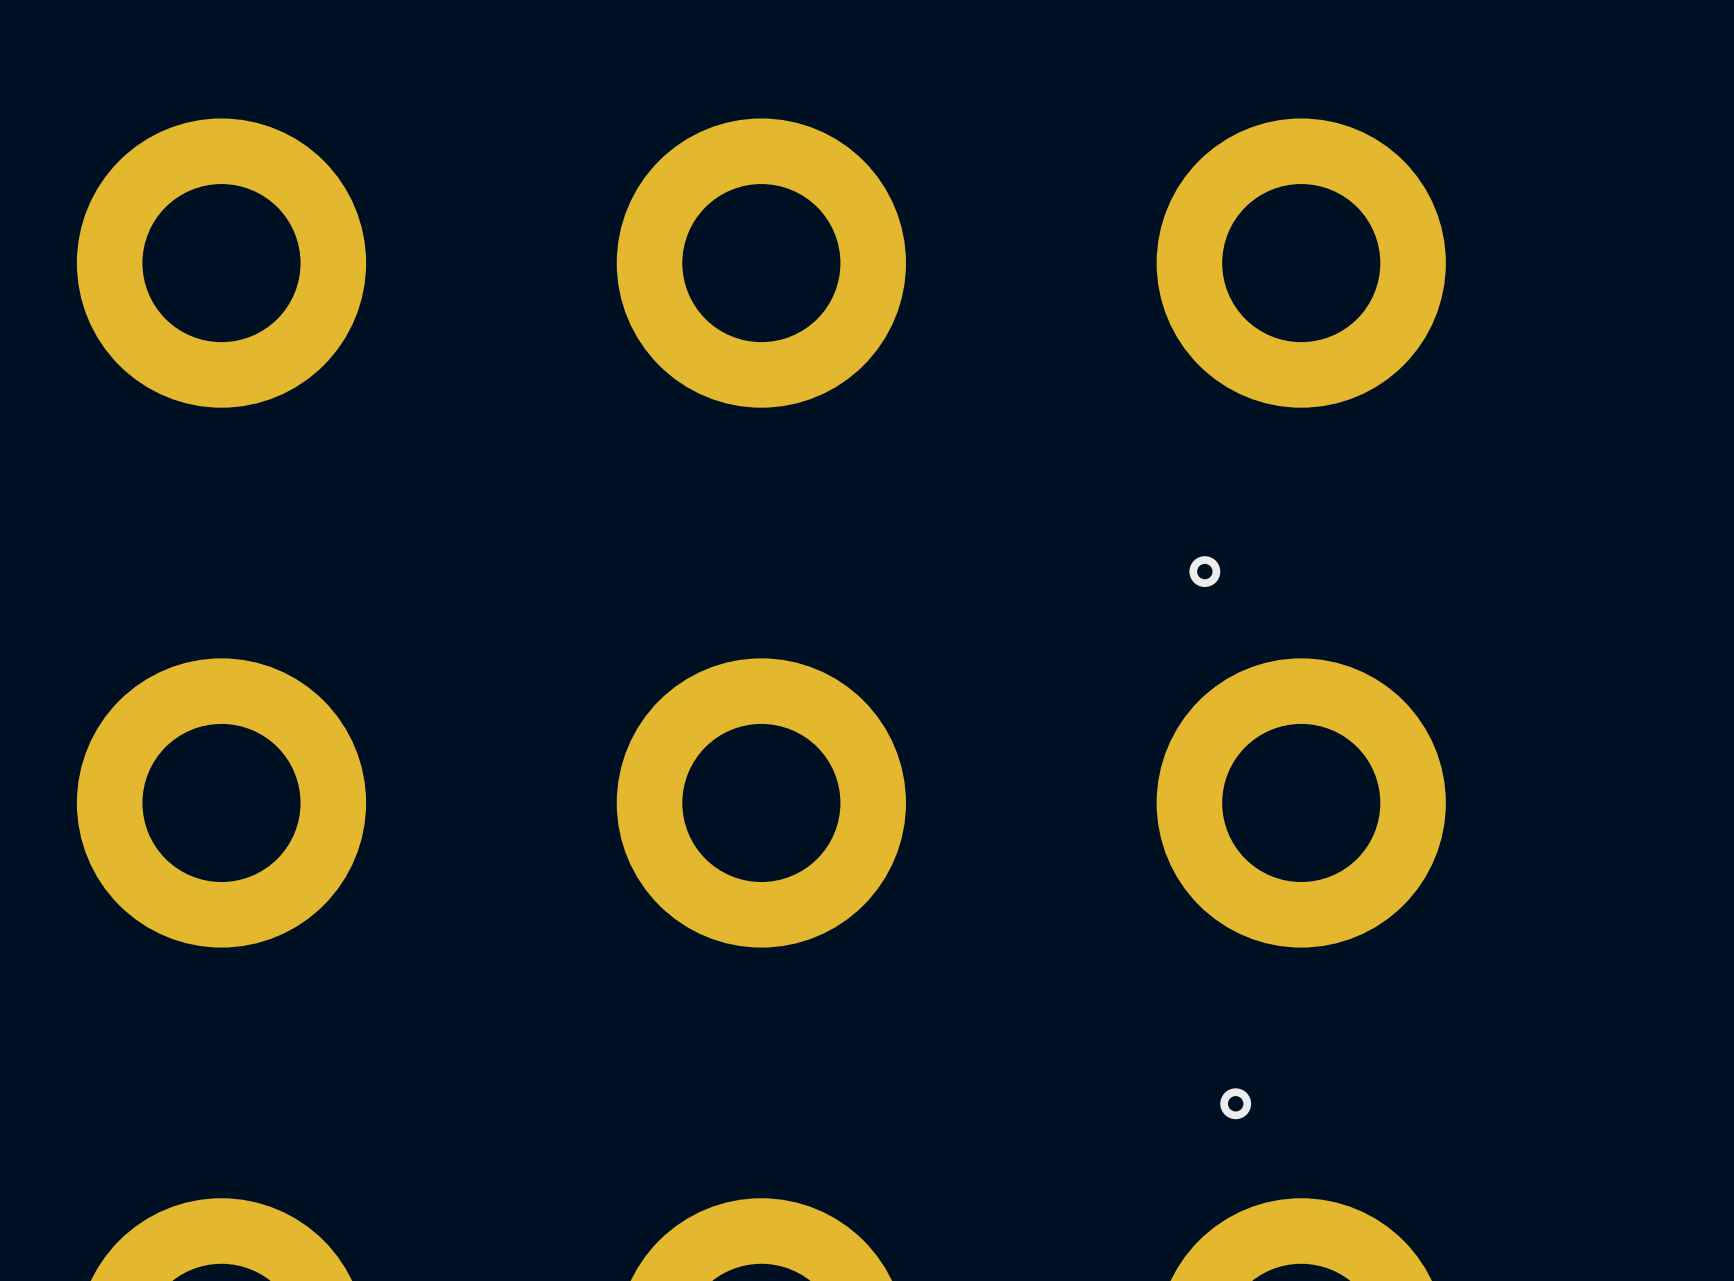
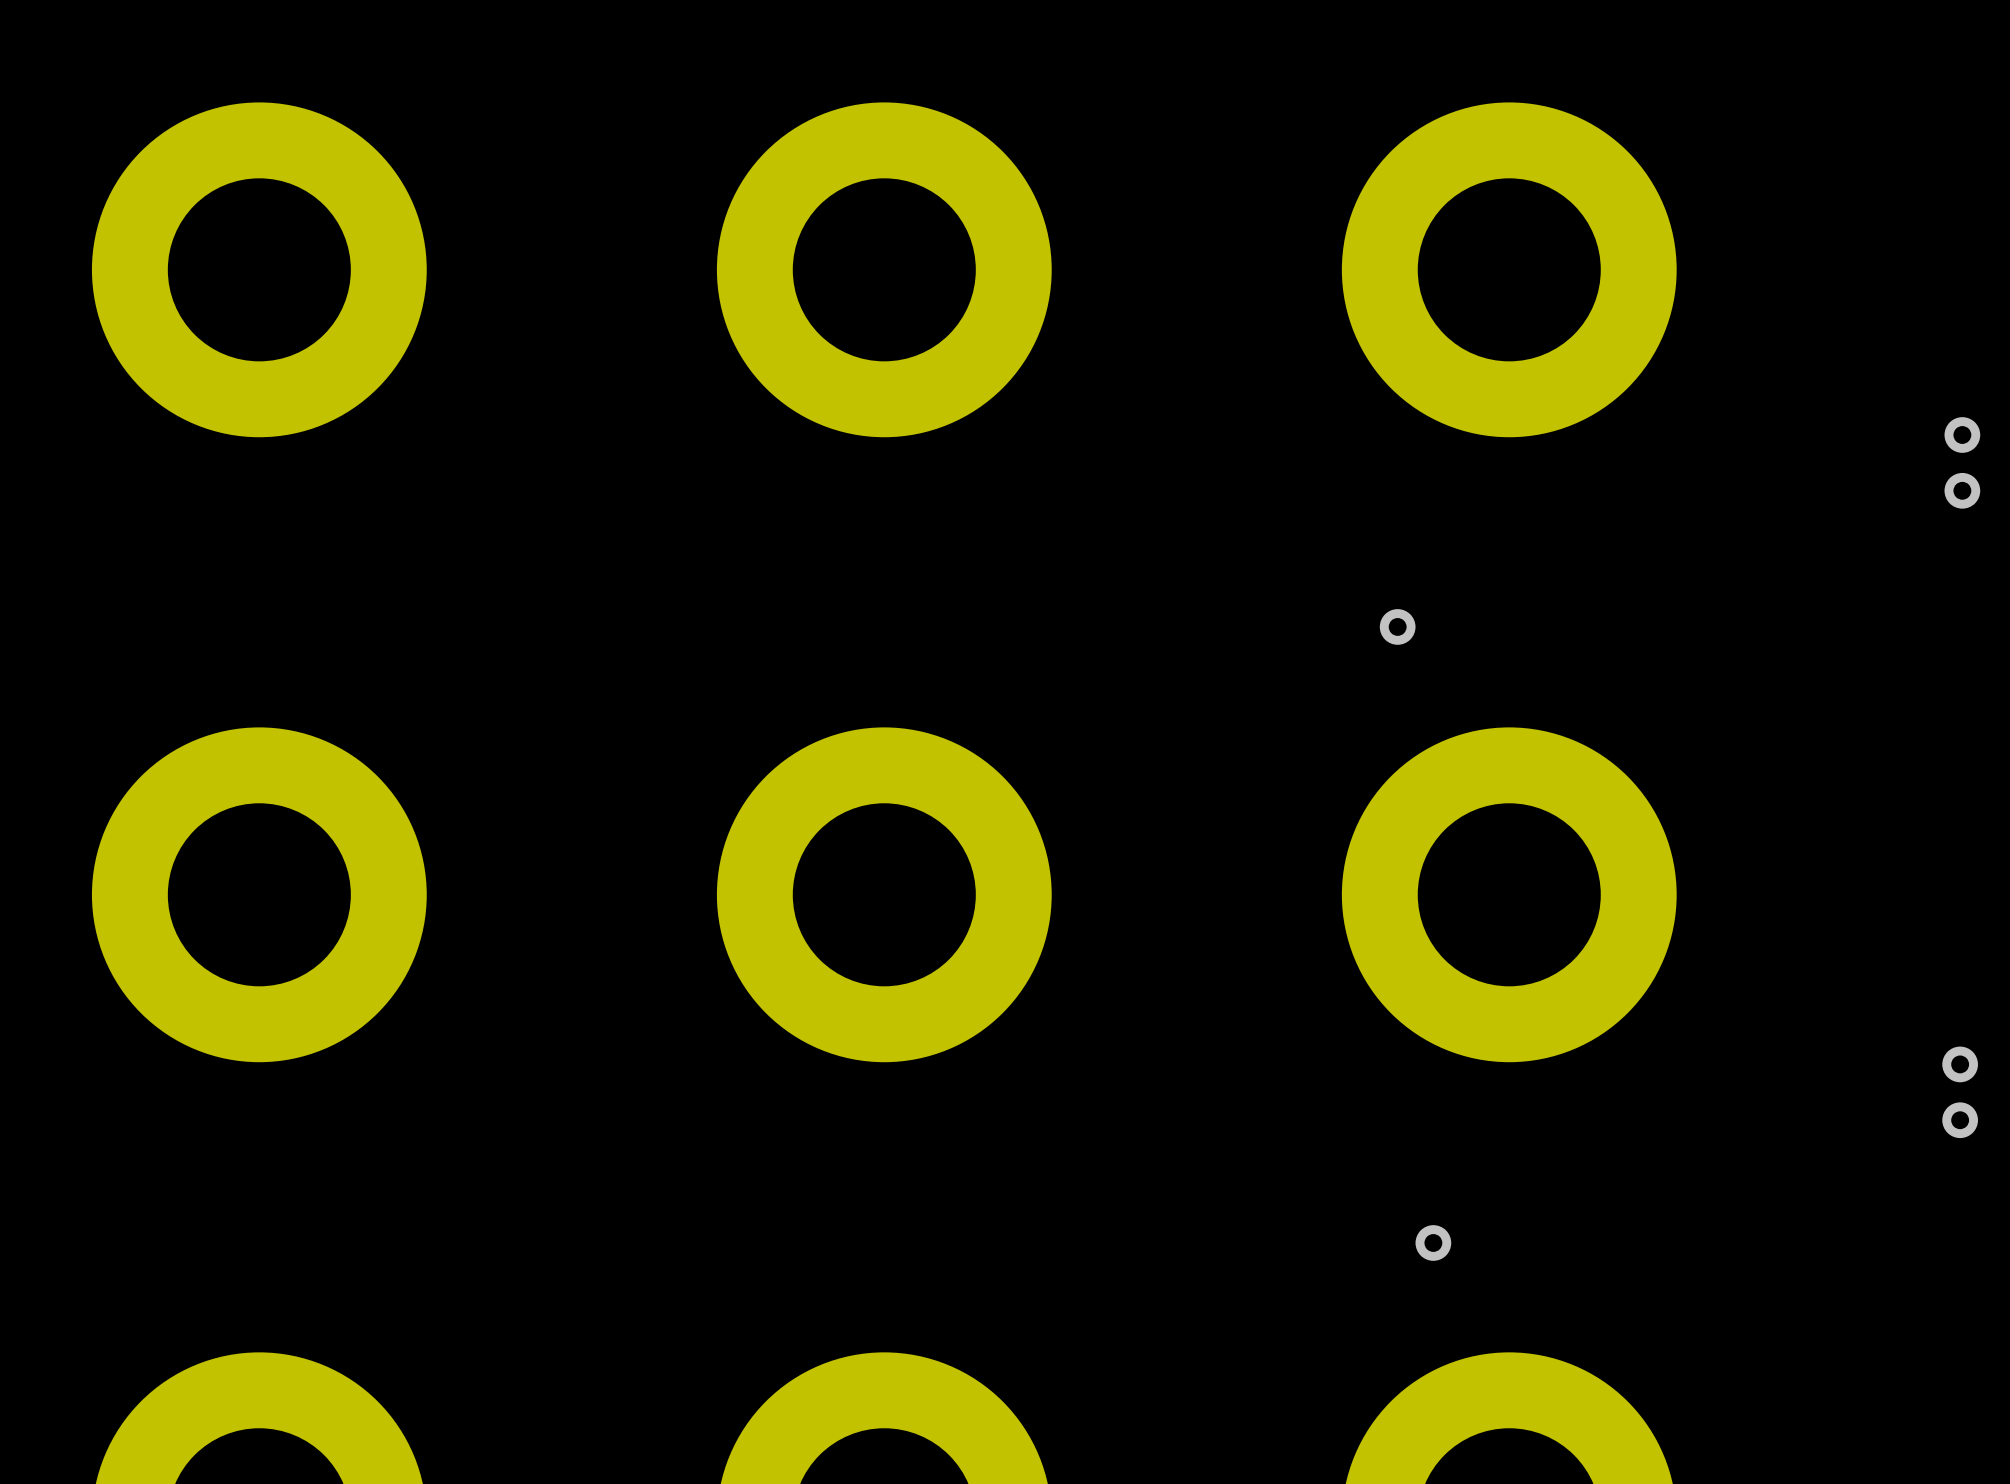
via: none -> (1962, 435)
via: none -> (1962, 490)
via: none -> (1960, 1064)
via: none -> (1960, 1120)

